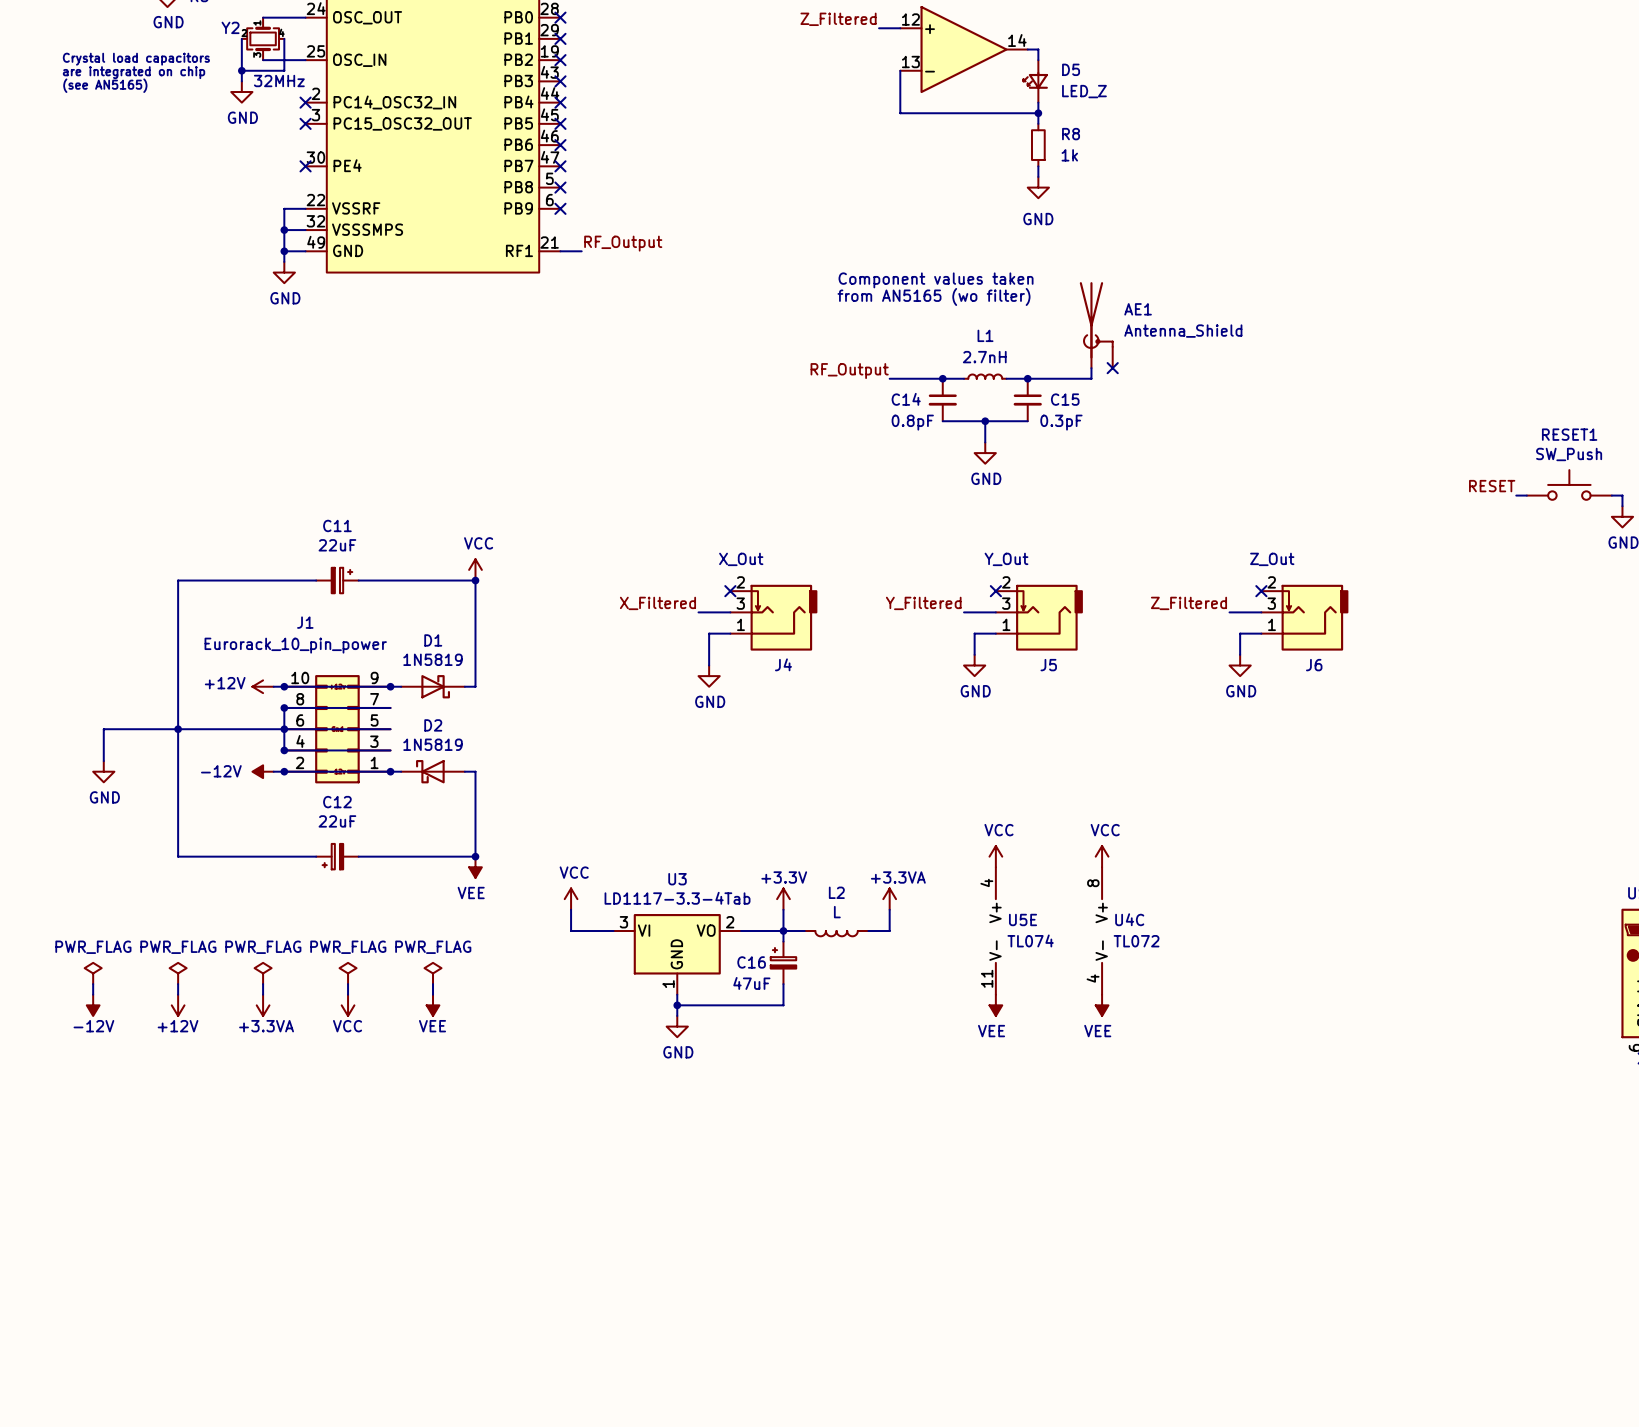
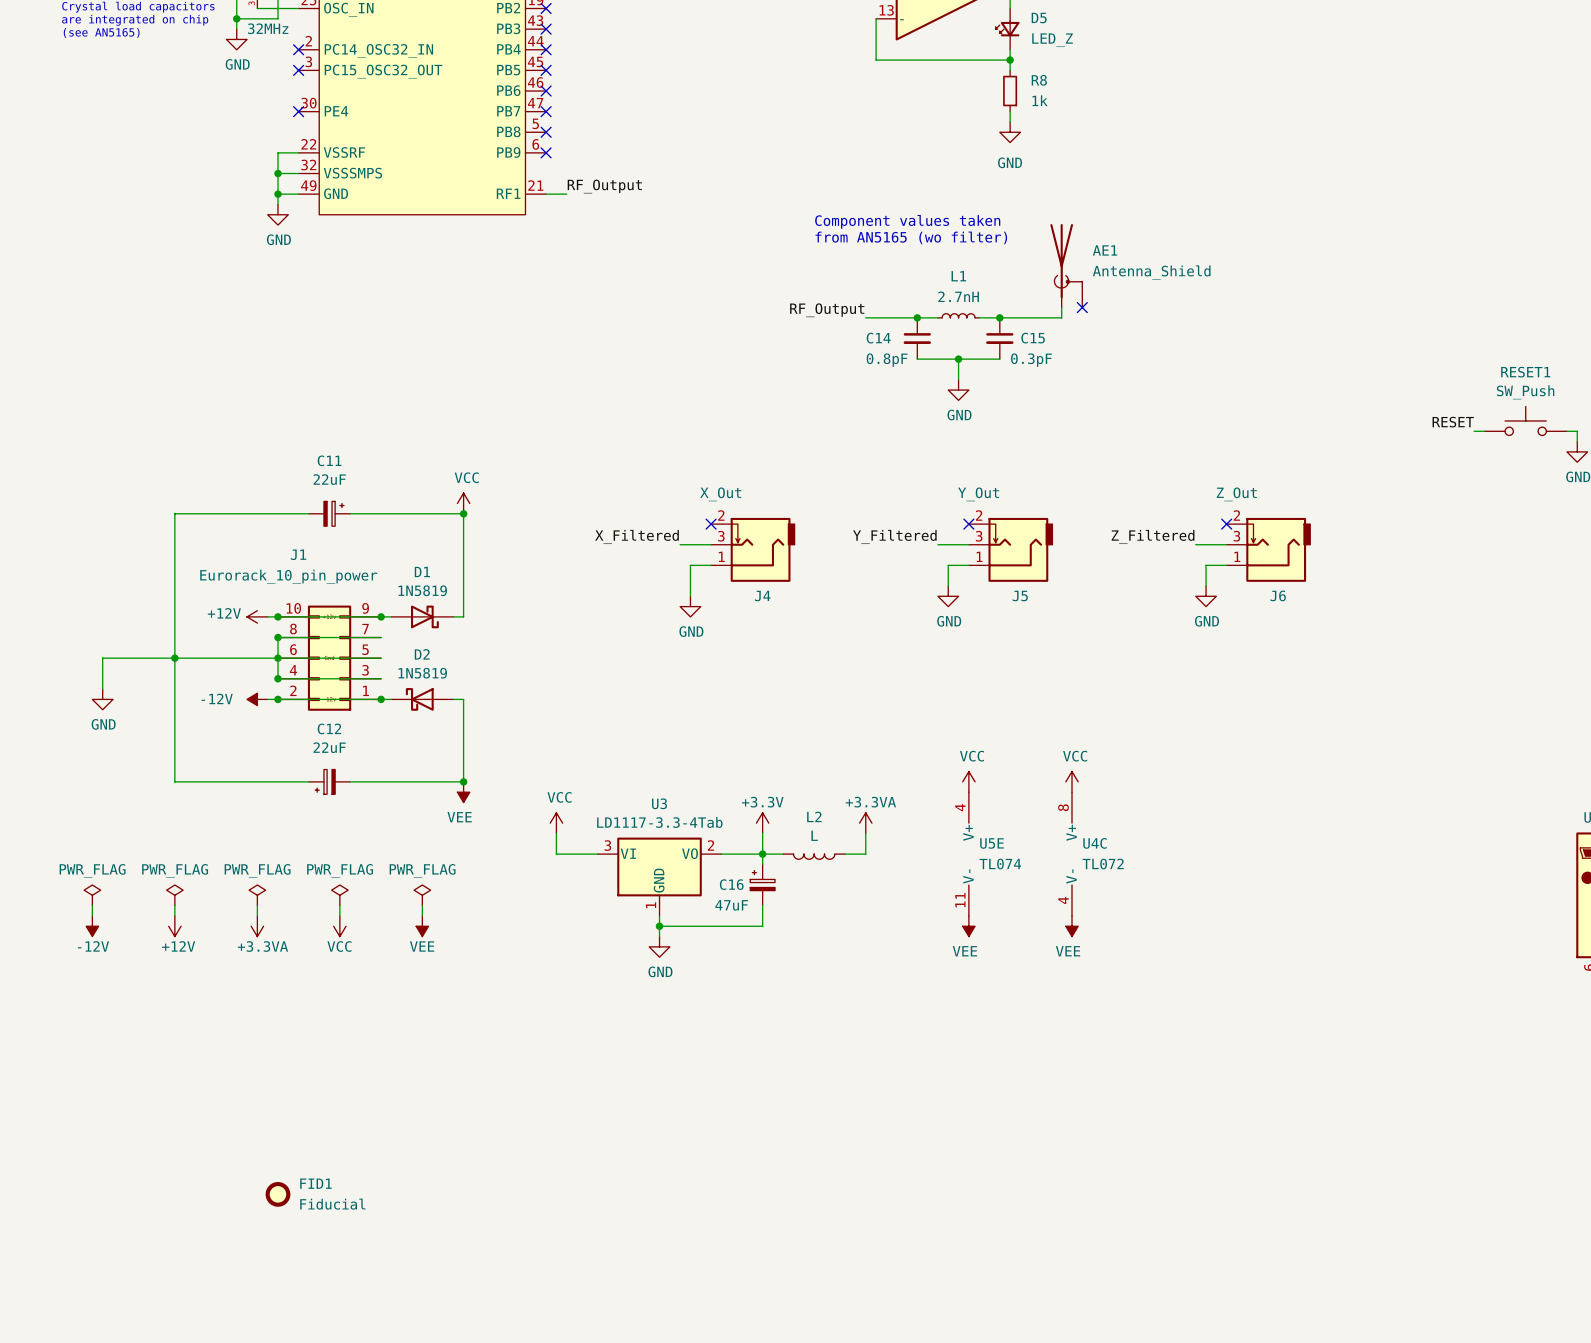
FID1: none -> Fiducial (277, 1194)

